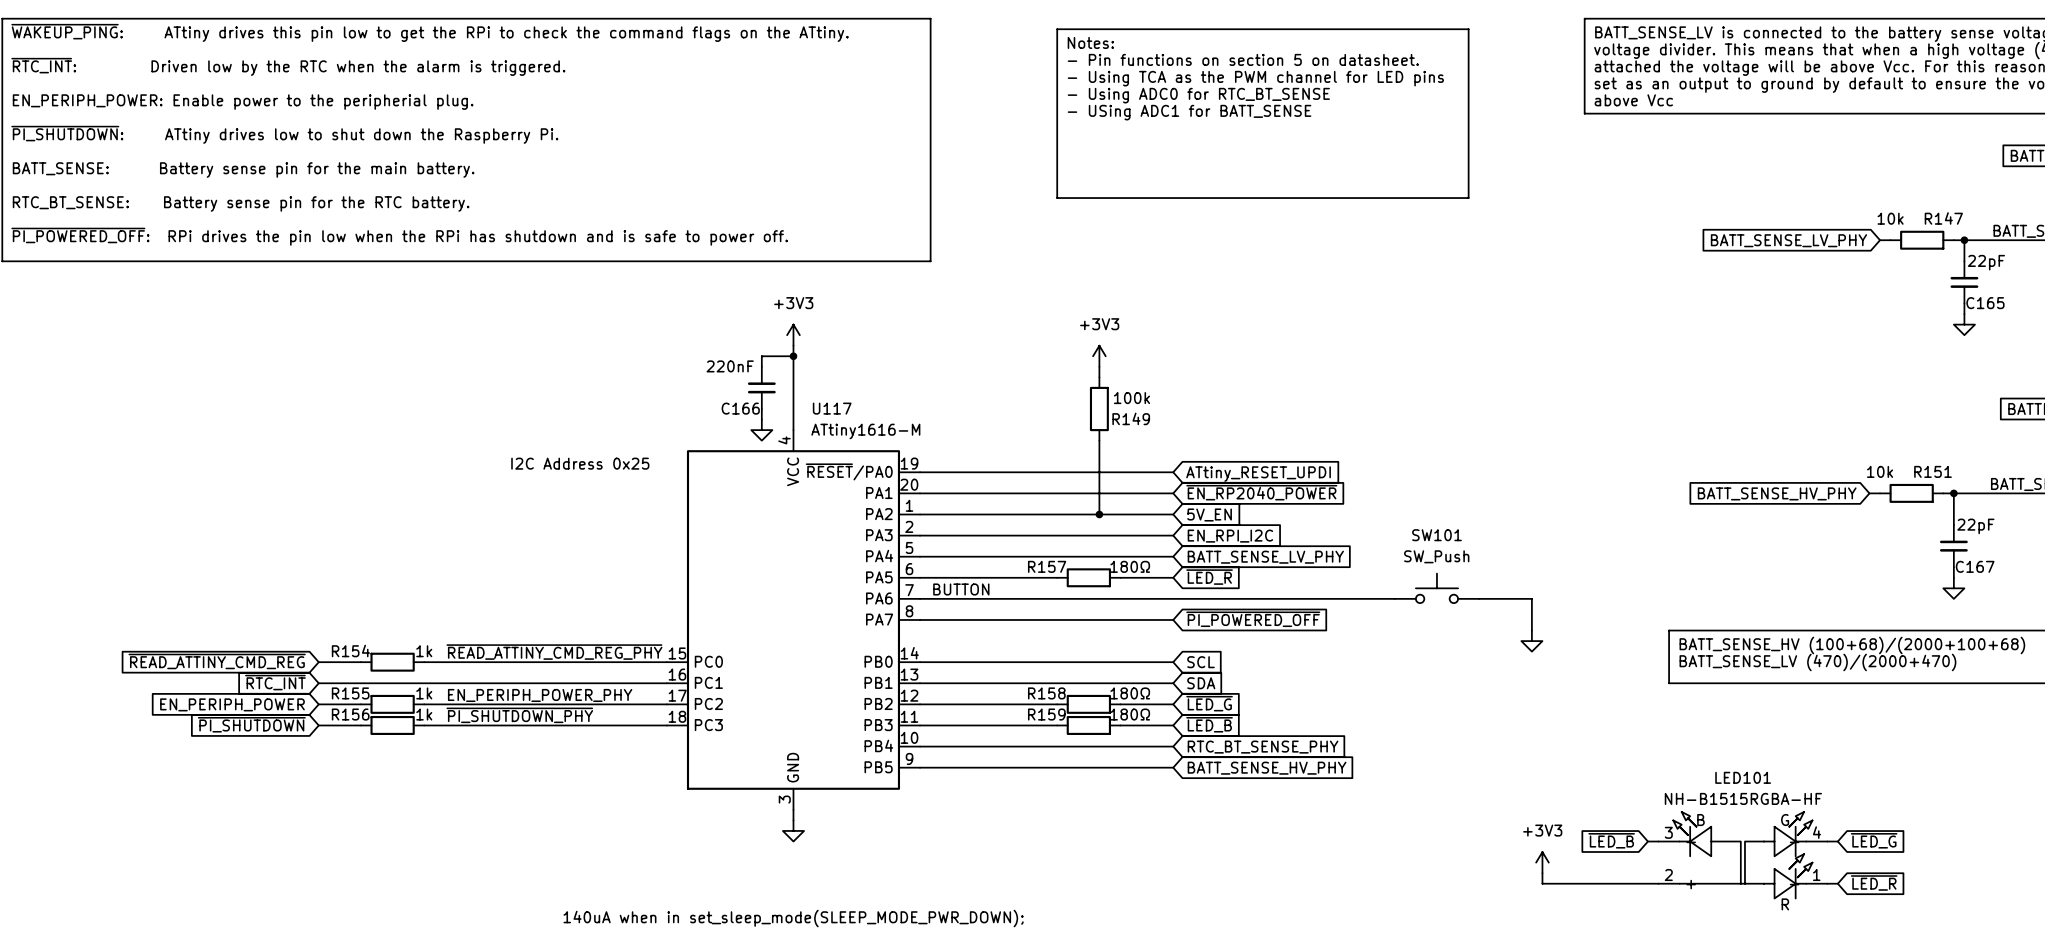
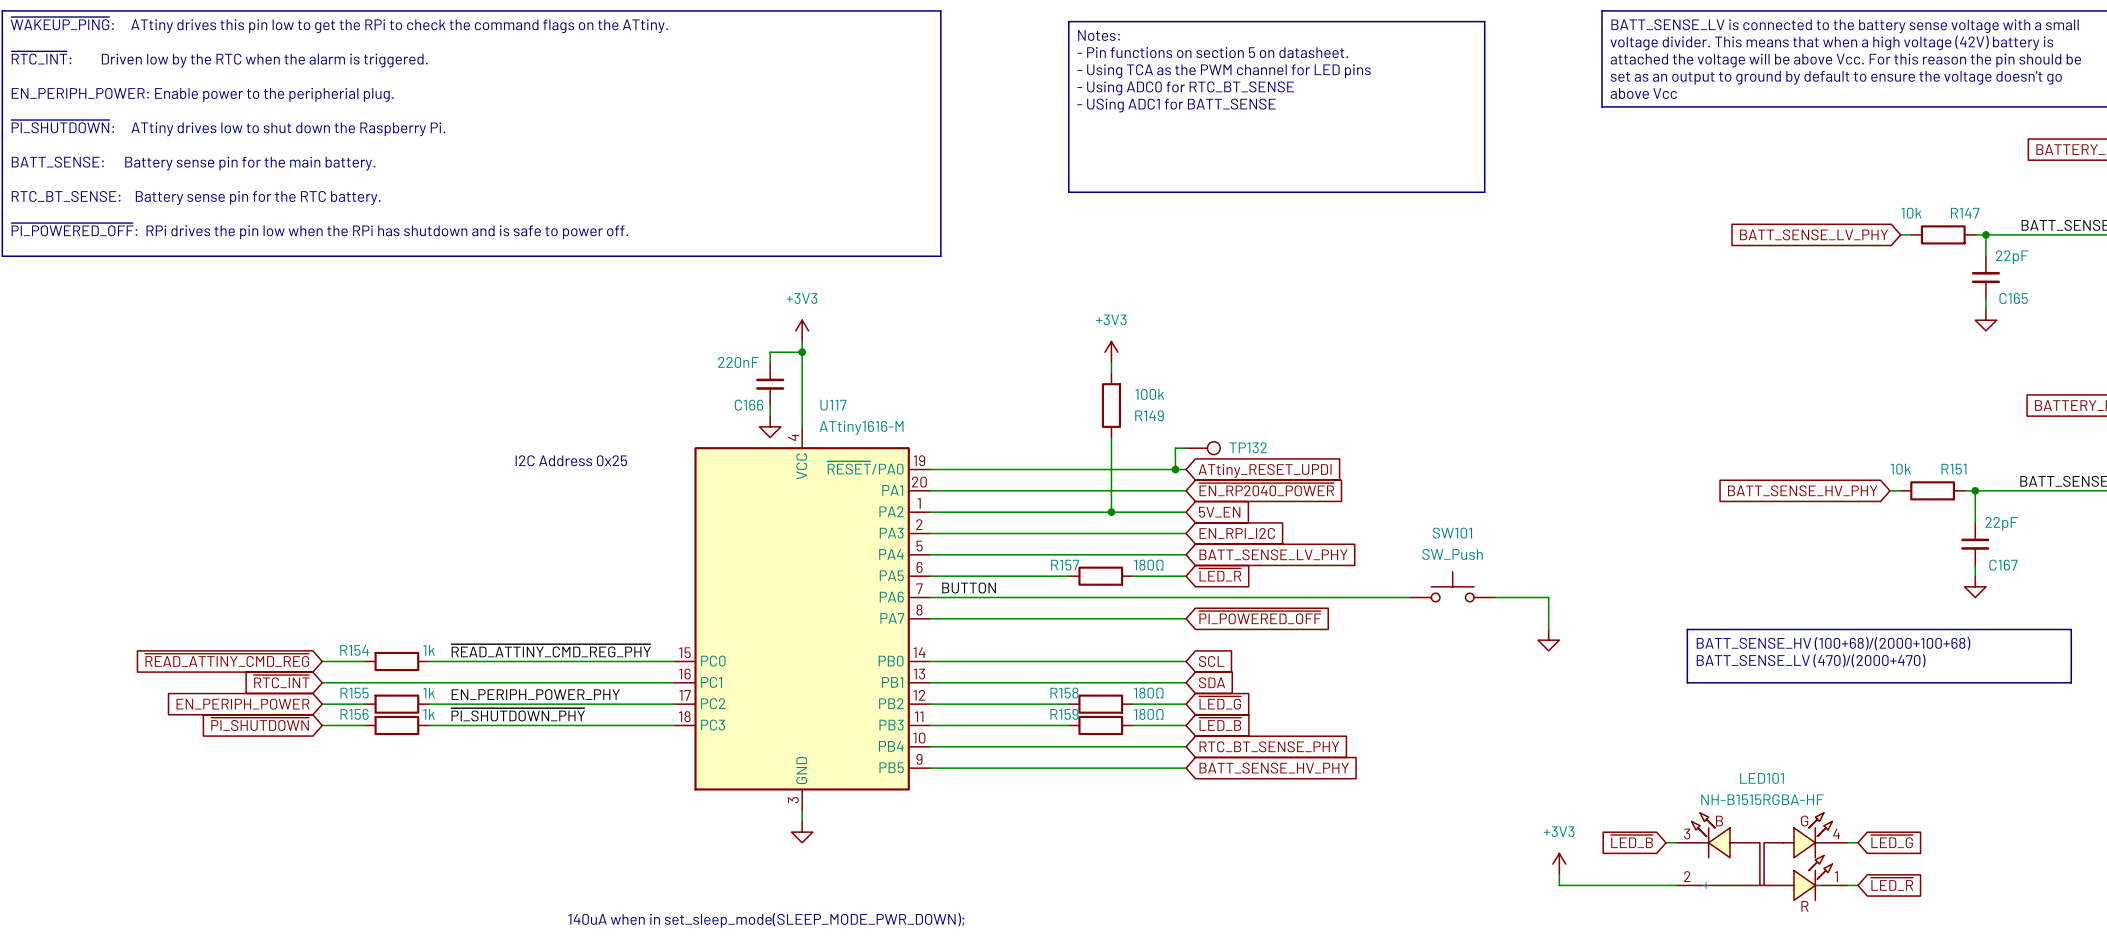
wire: none -> (1186, 448) (1175, 448) (1175, 469)
TP132: none -> (1203, 448)
junction: none -> (1175, 469)

